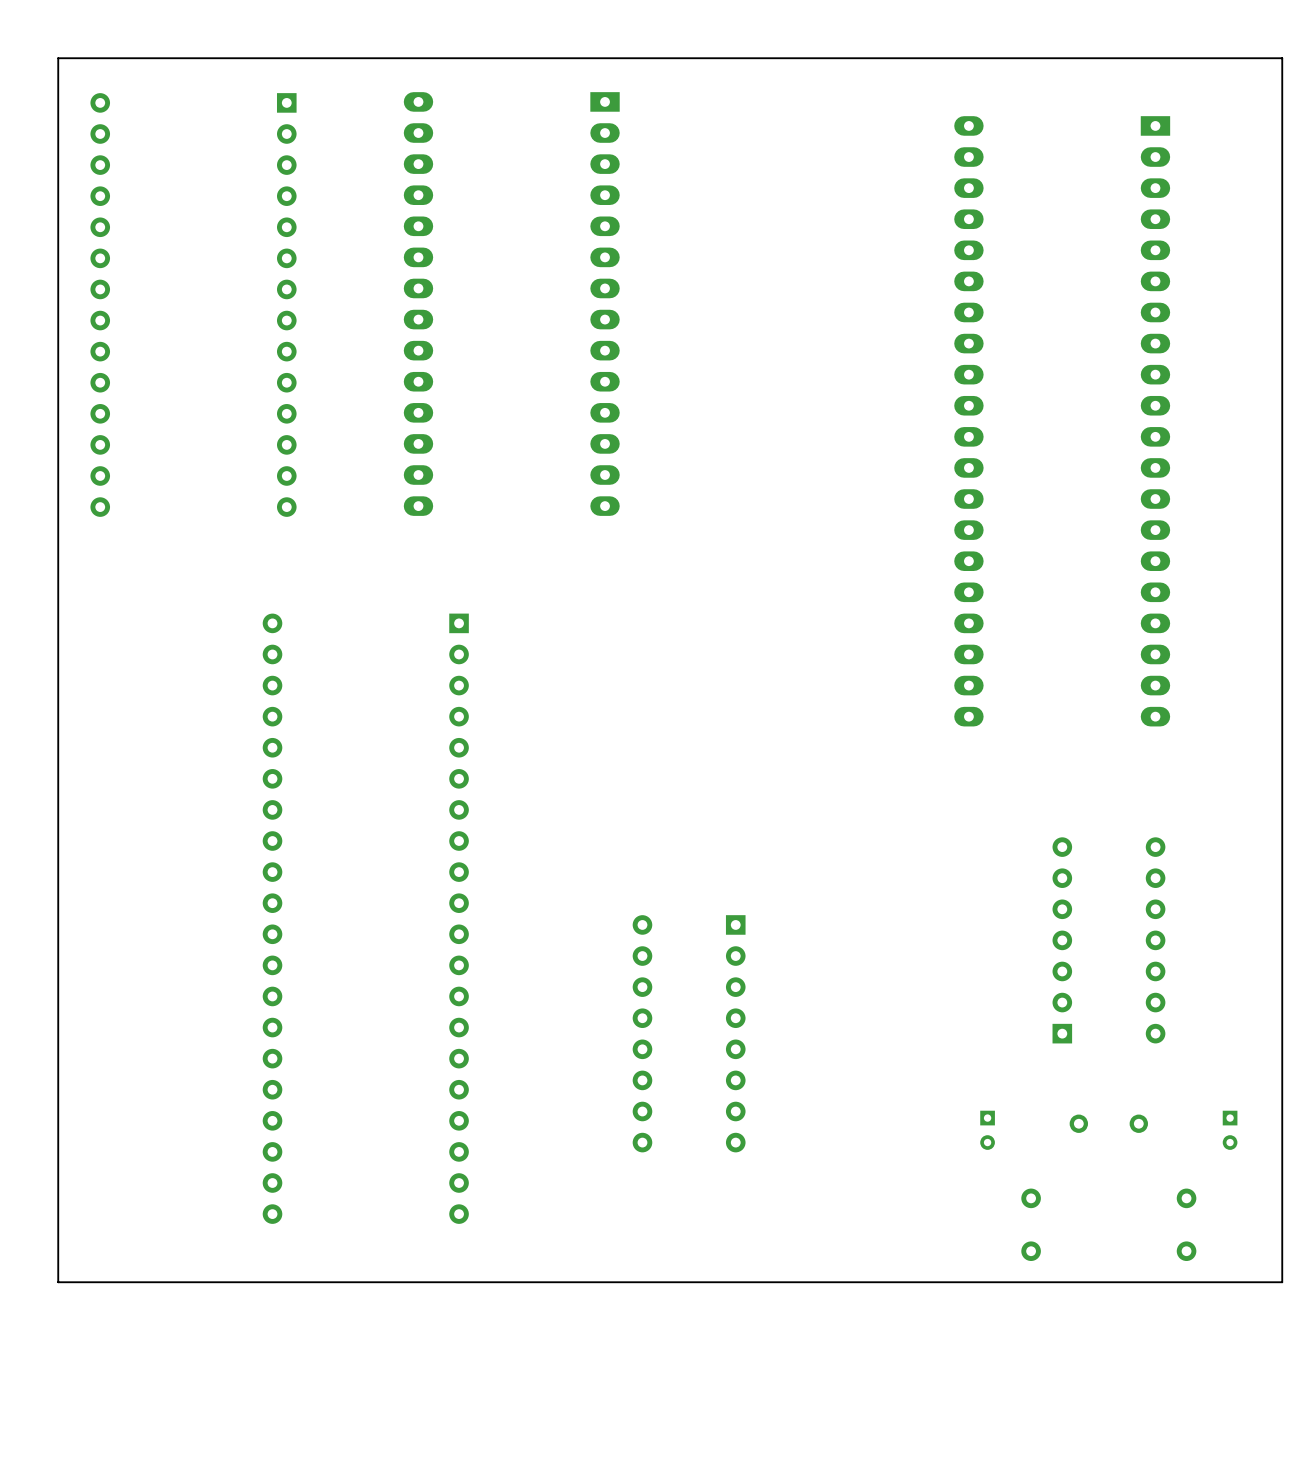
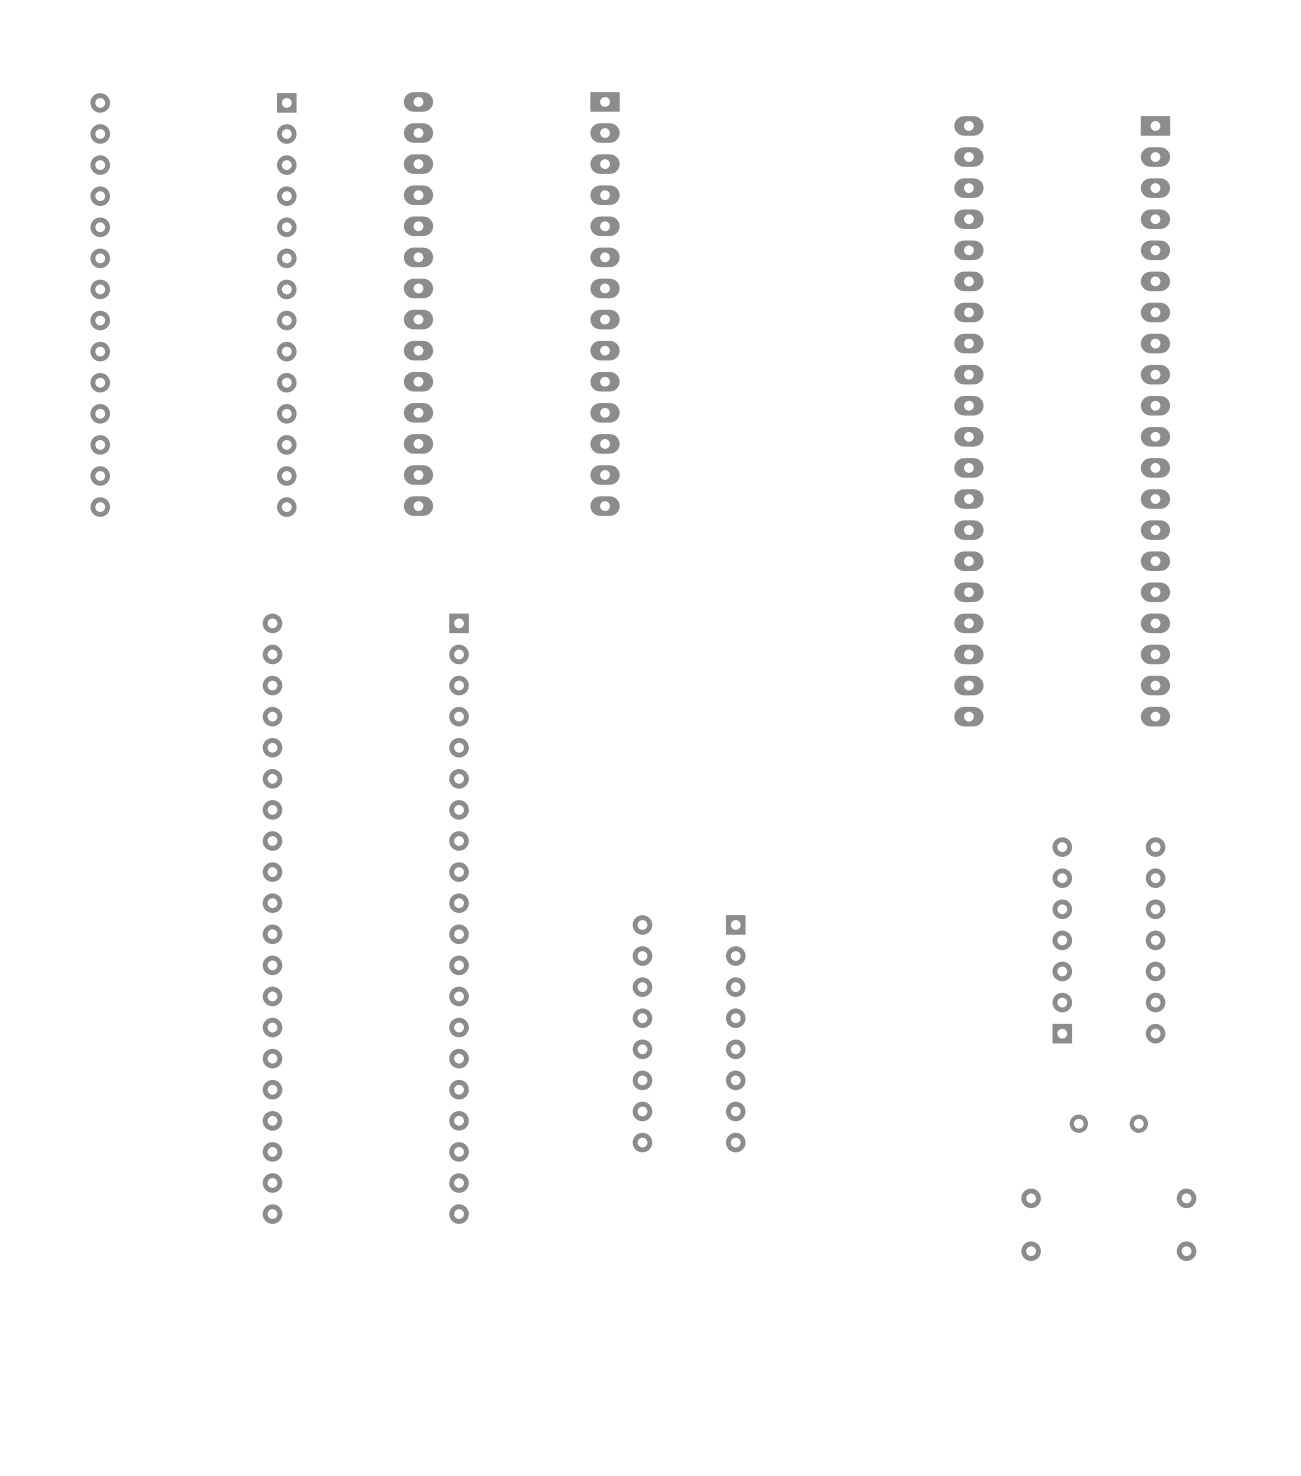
board edge: (1282, 58) (58, 58) (58, 1282) (1282, 1282) (1282, 58) -> none
part: (987, 1130) -> none
part: (1230, 1130) -> none

